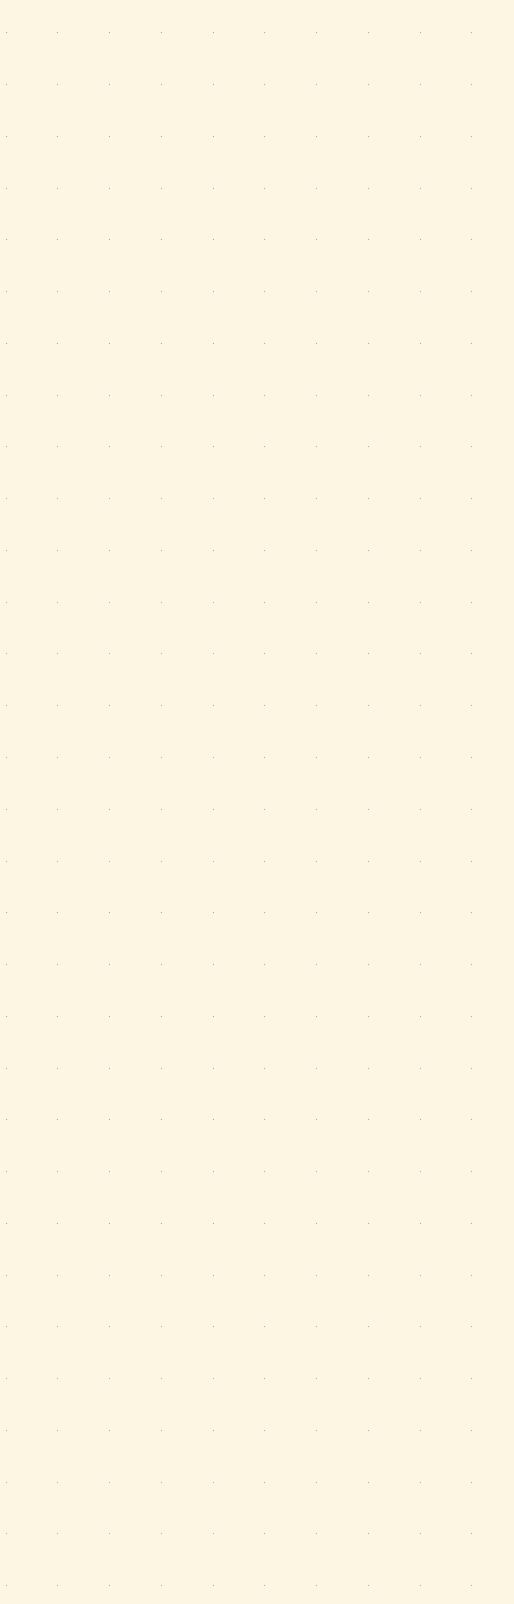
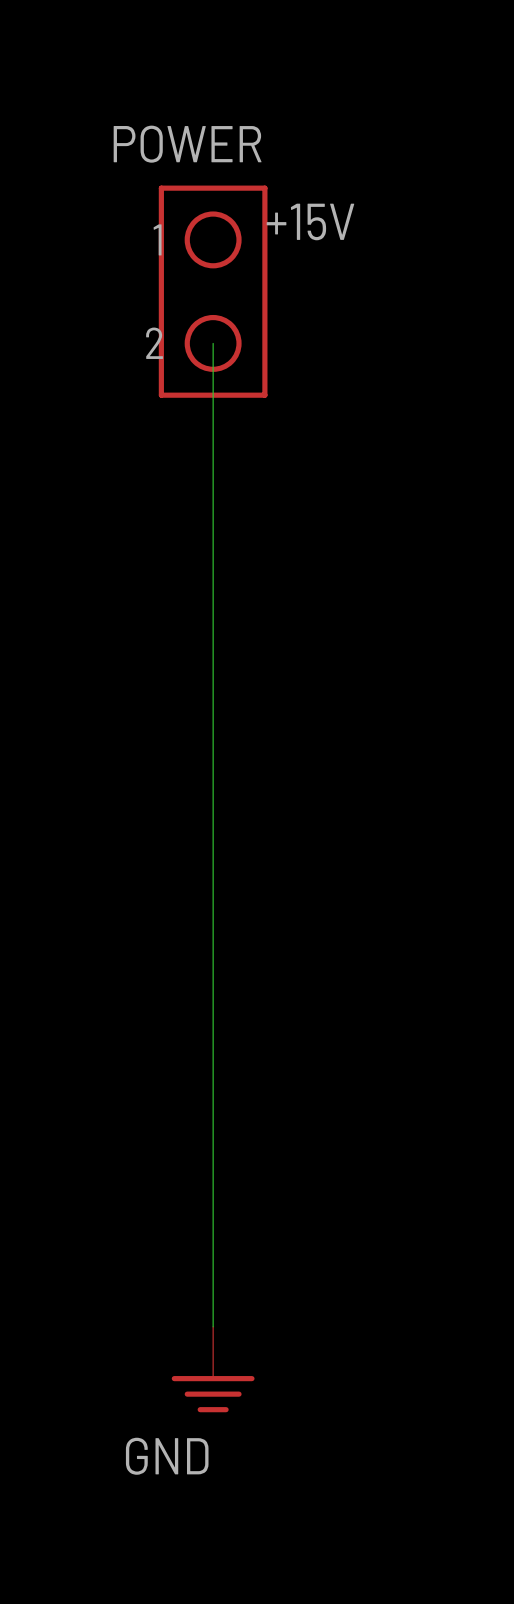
label: none -> +15V (310, 221)
POWER: none -> (213, 291)
wire: none -> (213, 343) (213, 1326)
power symbol: none -> GND (213, 1369)

